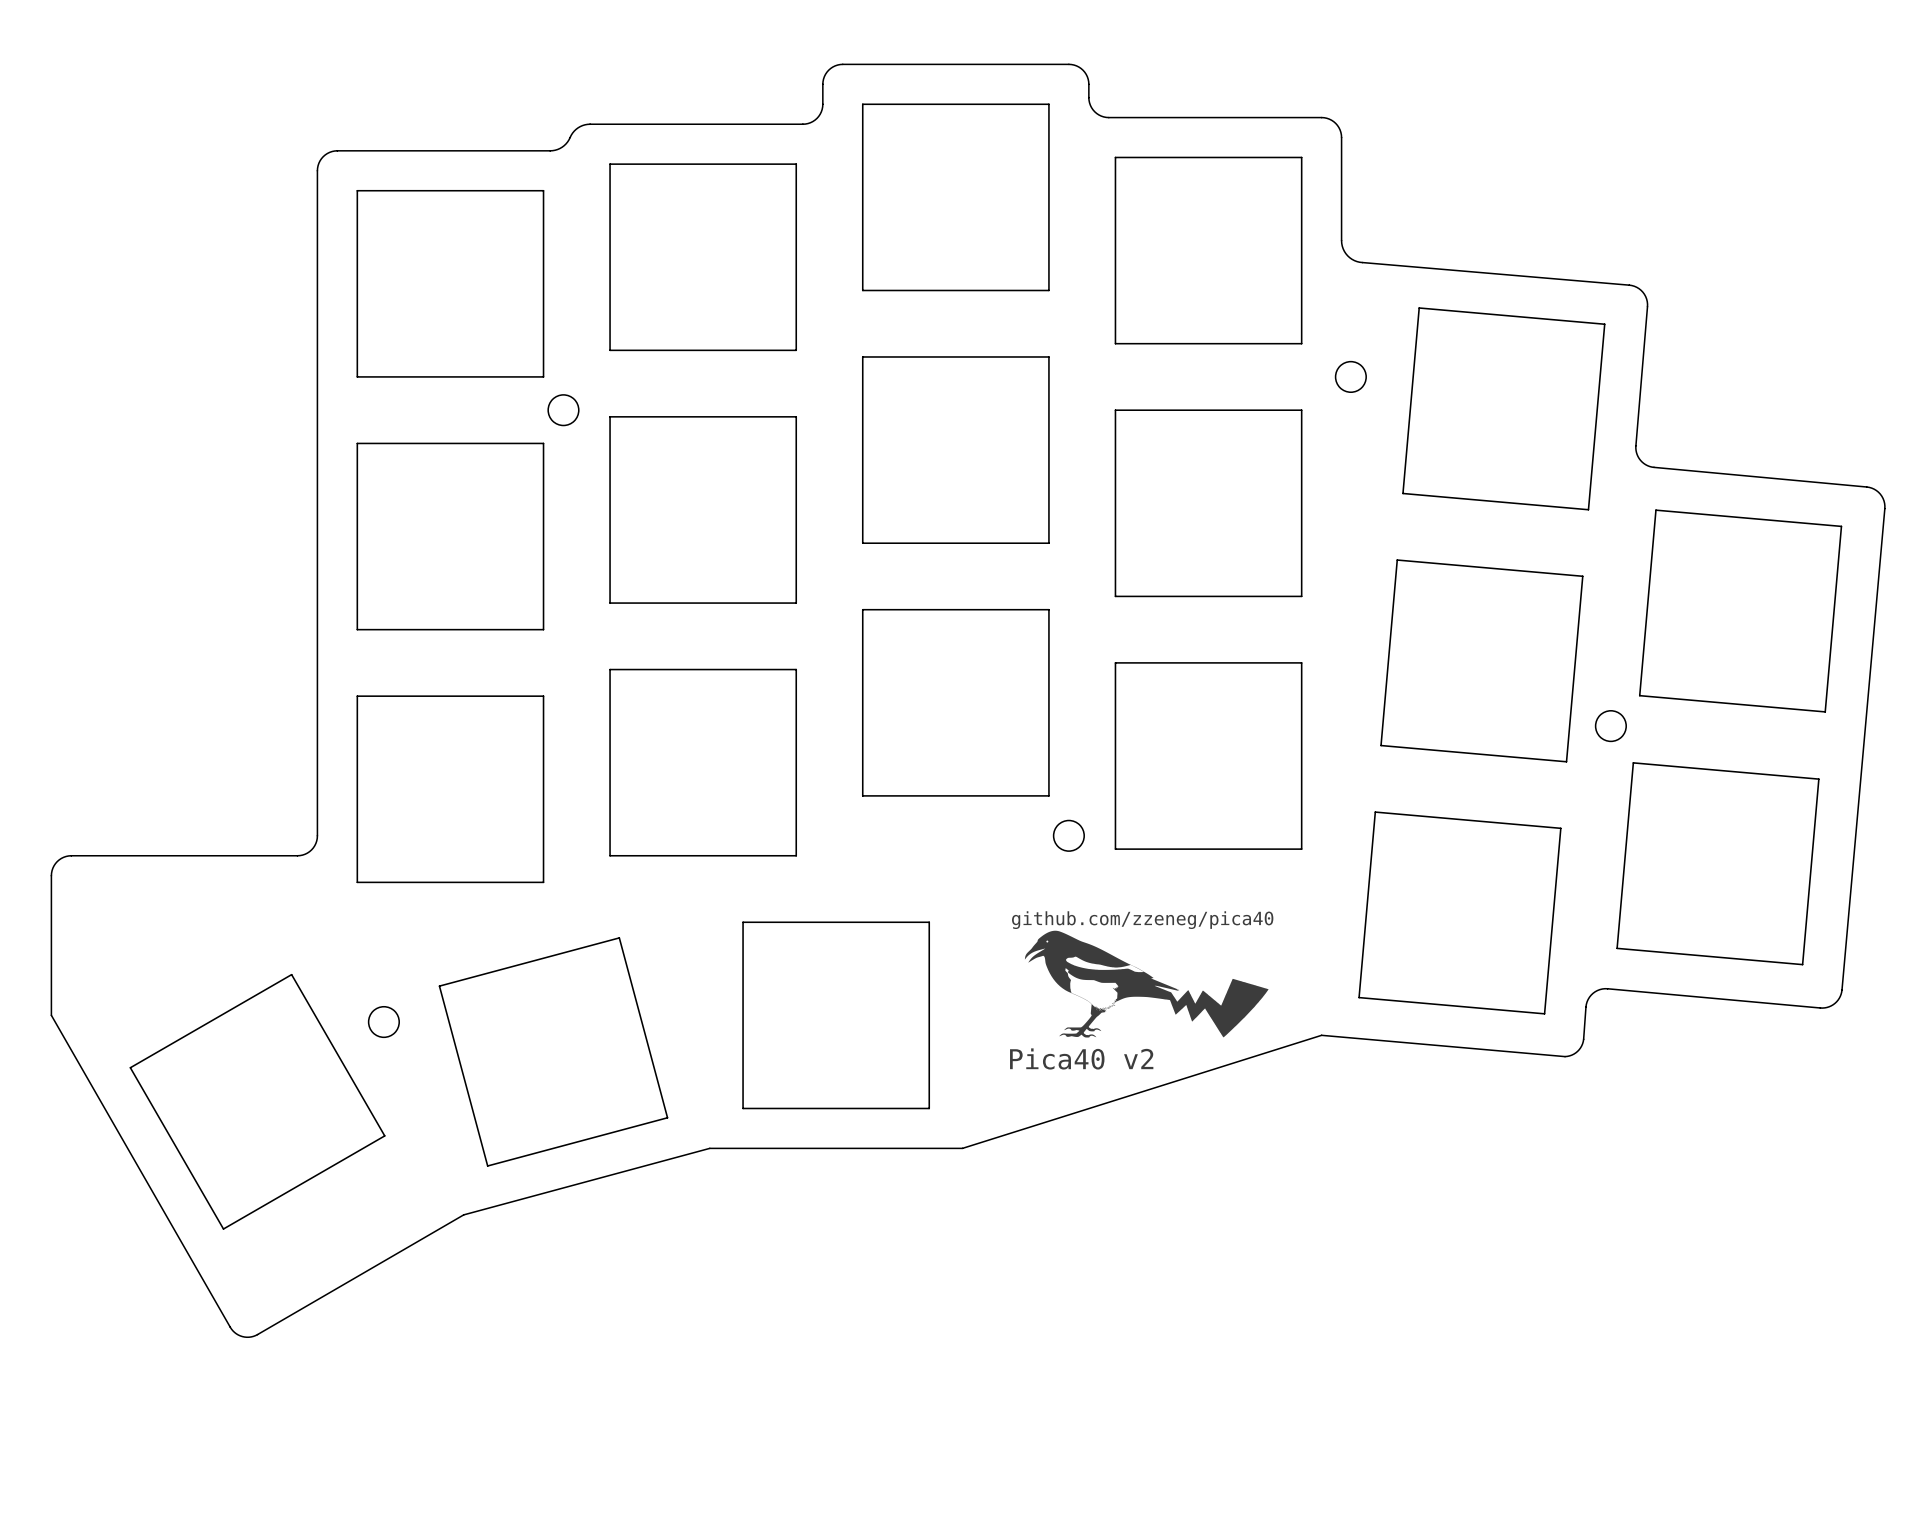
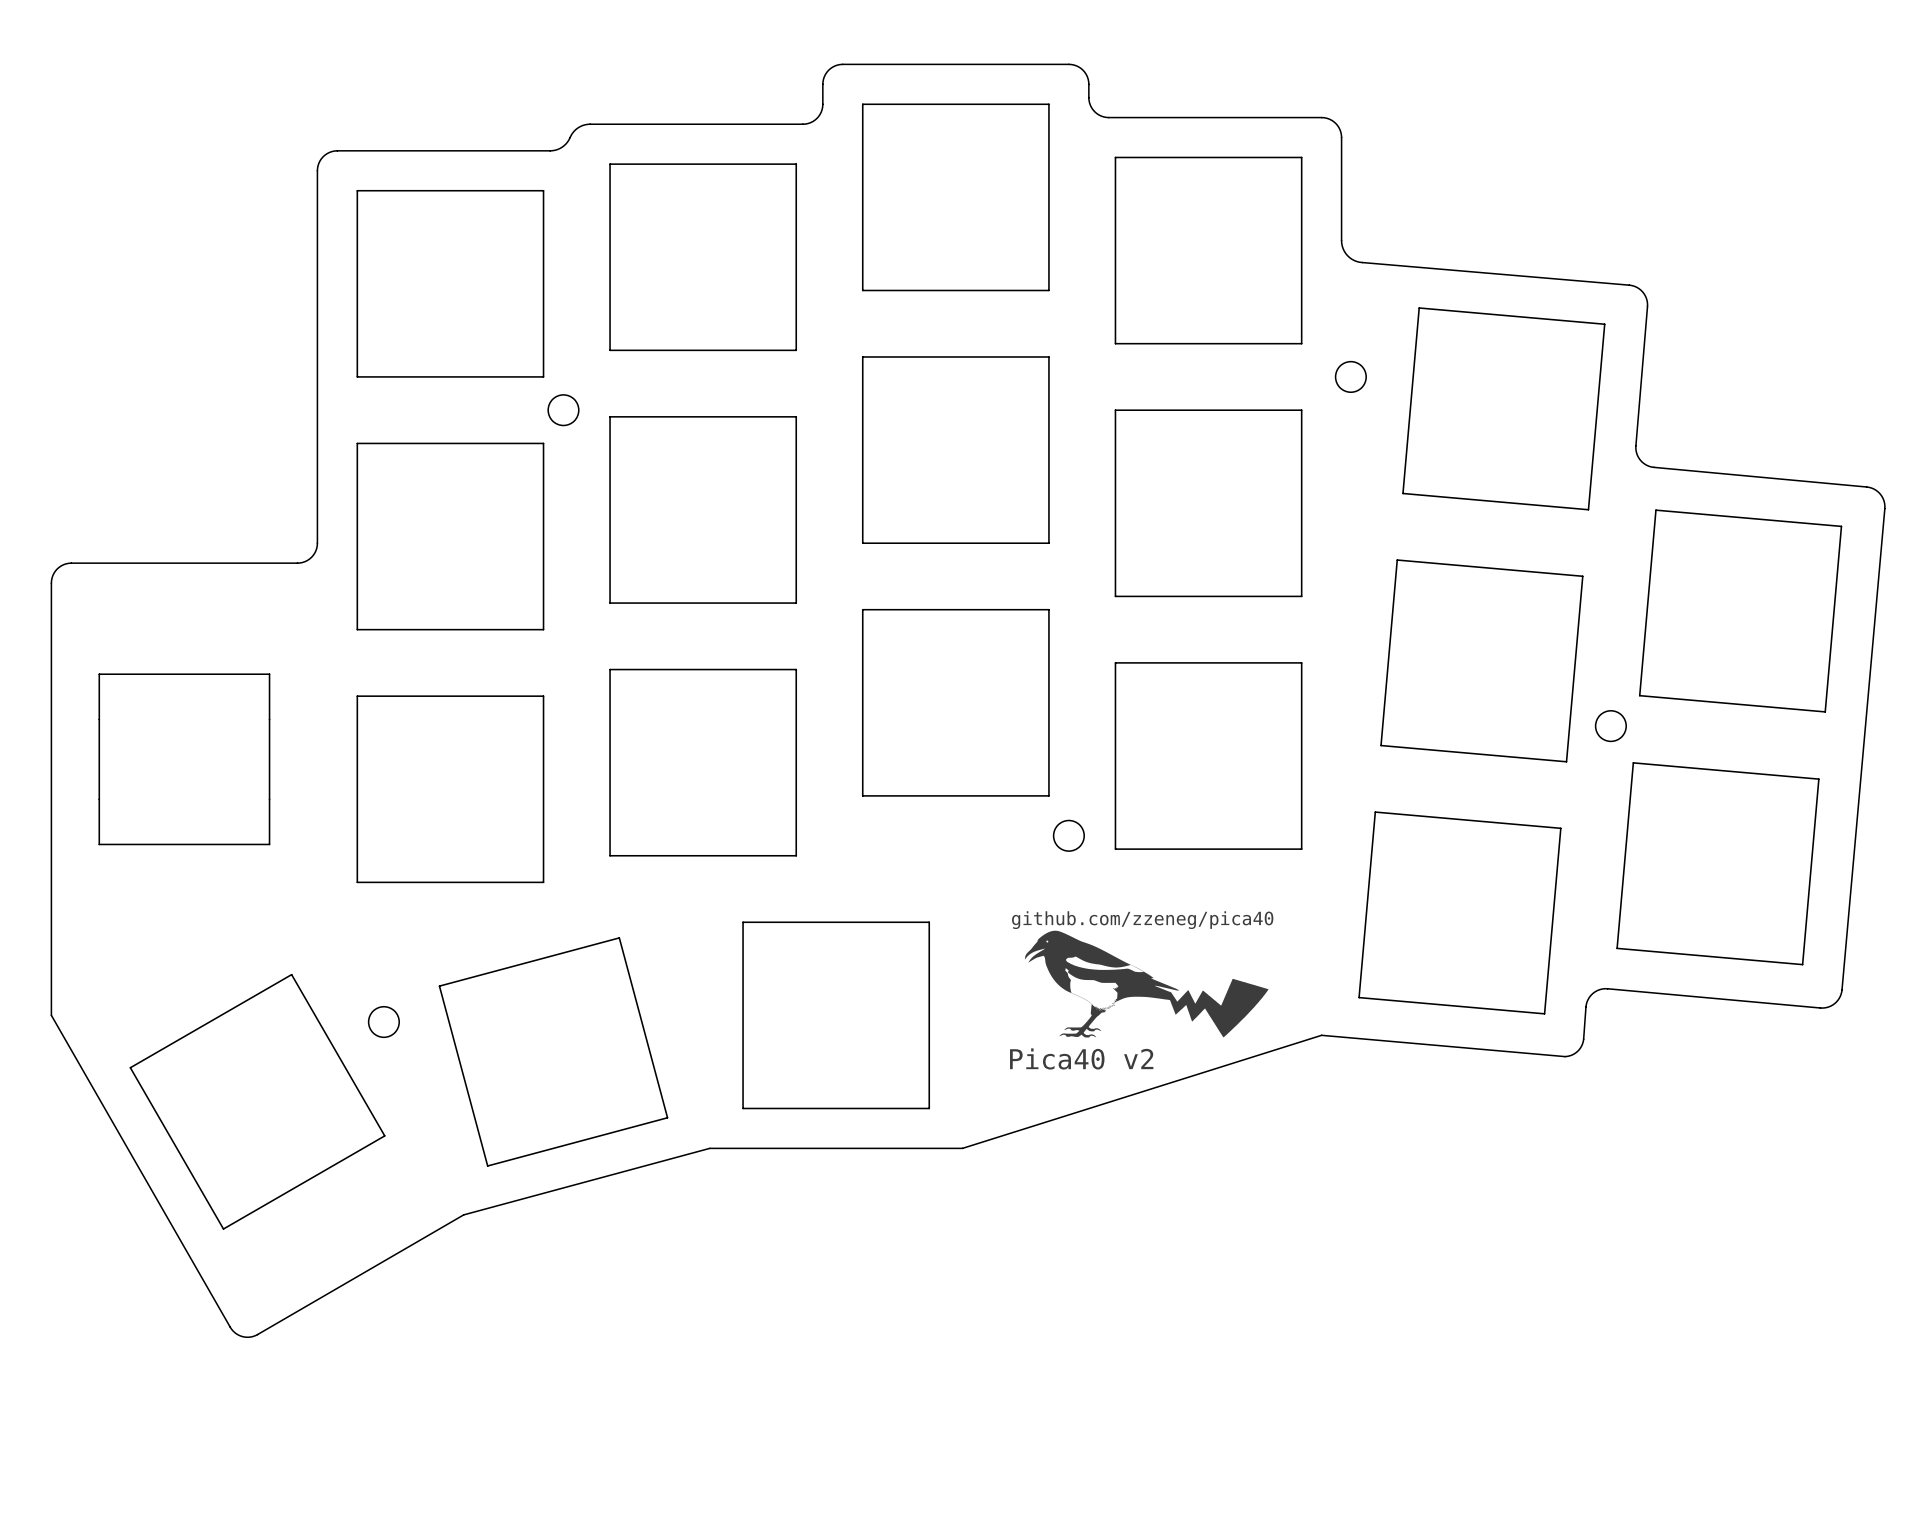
board edge: (317, 543) (317, 835) (313, 847) (307, 853) (297, 855) (68, 855) (57, 861) (52, 868) (51, 875) -> (317, 543) (313, 555) (307, 560) (300, 562) (71, 563) (63, 564) (55, 570) (51, 583) (51, 875)
drawing: none -> [98, 673, 271, 846]

